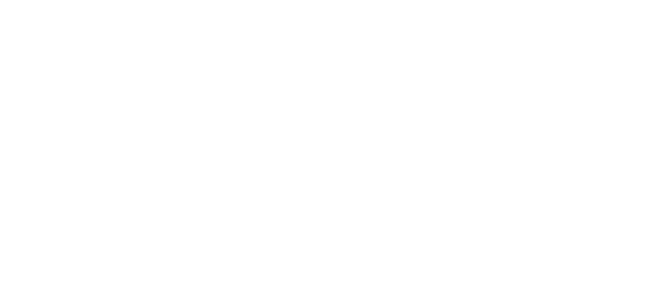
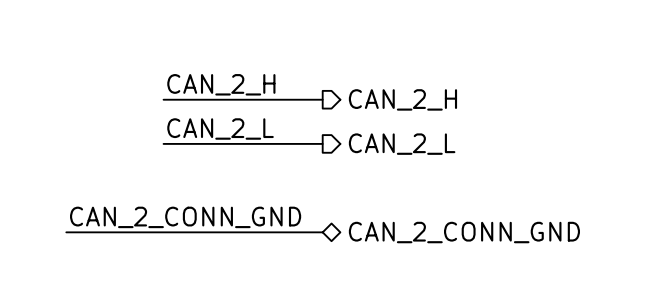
label: none -> CAN_2_H (221, 84)
wire: none -> (163, 99) (322, 99)
hierarchical label: none -> CAN_2_H (402, 99)
label: none -> CAN_2_L (220, 129)
wire: none -> (163, 143) (322, 143)
hierarchical label: none -> CAN_2_L (402, 144)
label: none -> CAN_2_CONN_GND (185, 217)
wire: none -> (66, 232) (322, 232)
hierarchical label: none -> CAN_2_CONN_GND (464, 232)

